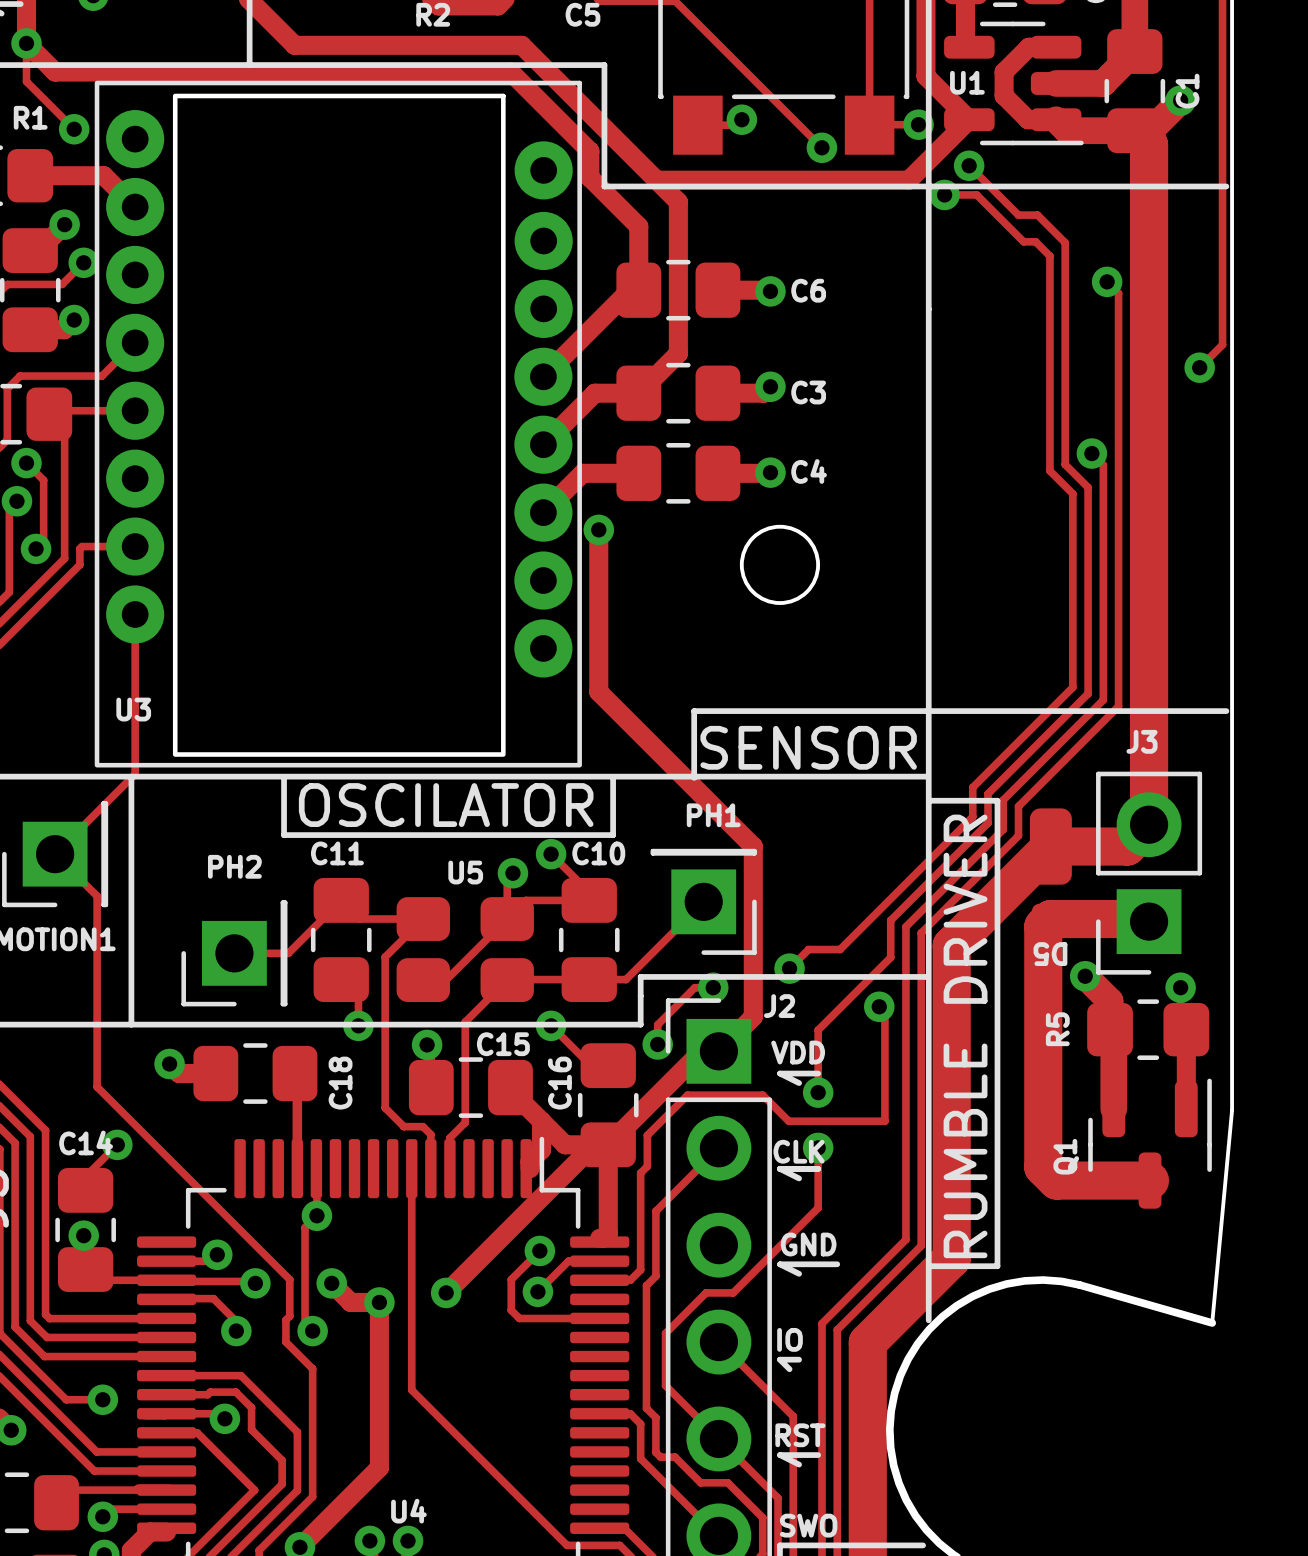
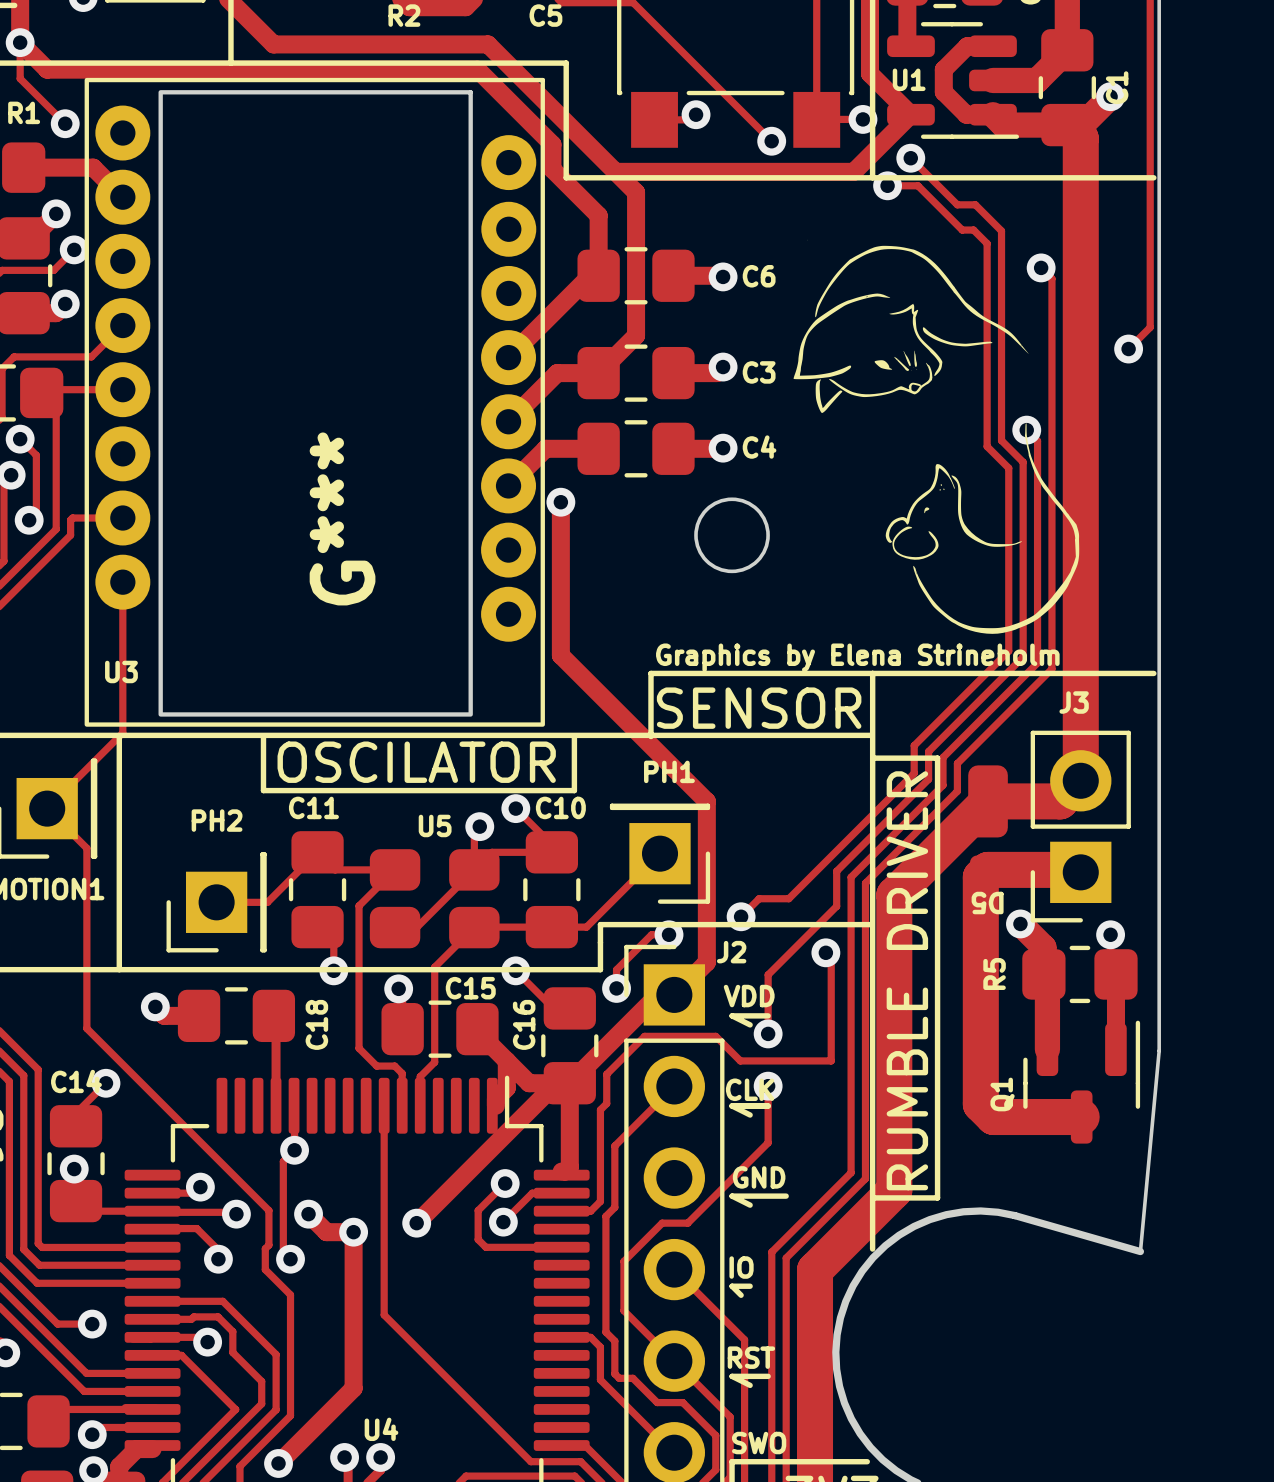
line: (928, 186) (928, 1320) -> (872, 673) (872, 1249)
G***: none -> (936, 436)
text: none -> Graphics by Elena Strineholm (857, 657)

